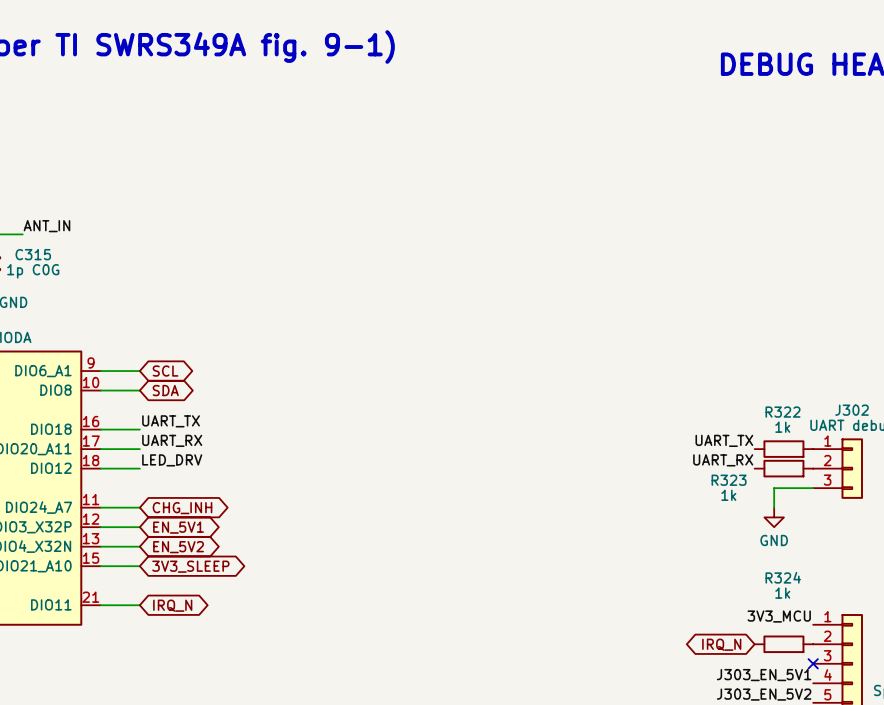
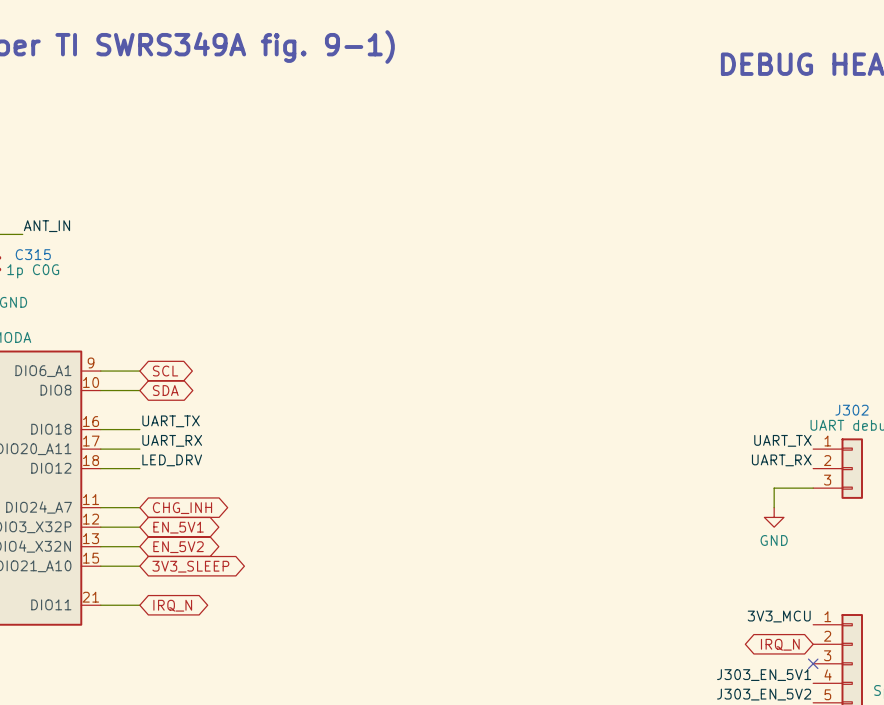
label position: UART_TX (724, 440) -> UART_TX (782, 440)
R322: 1k (783, 449) -> none
label position: UART_RX (723, 460) -> UART_RX (781, 460)
R323: 1k (783, 468) -> none
global label position: IRQ_N (721, 644) -> IRQ_N (780, 644)
R324: 1k (783, 644) -> none

